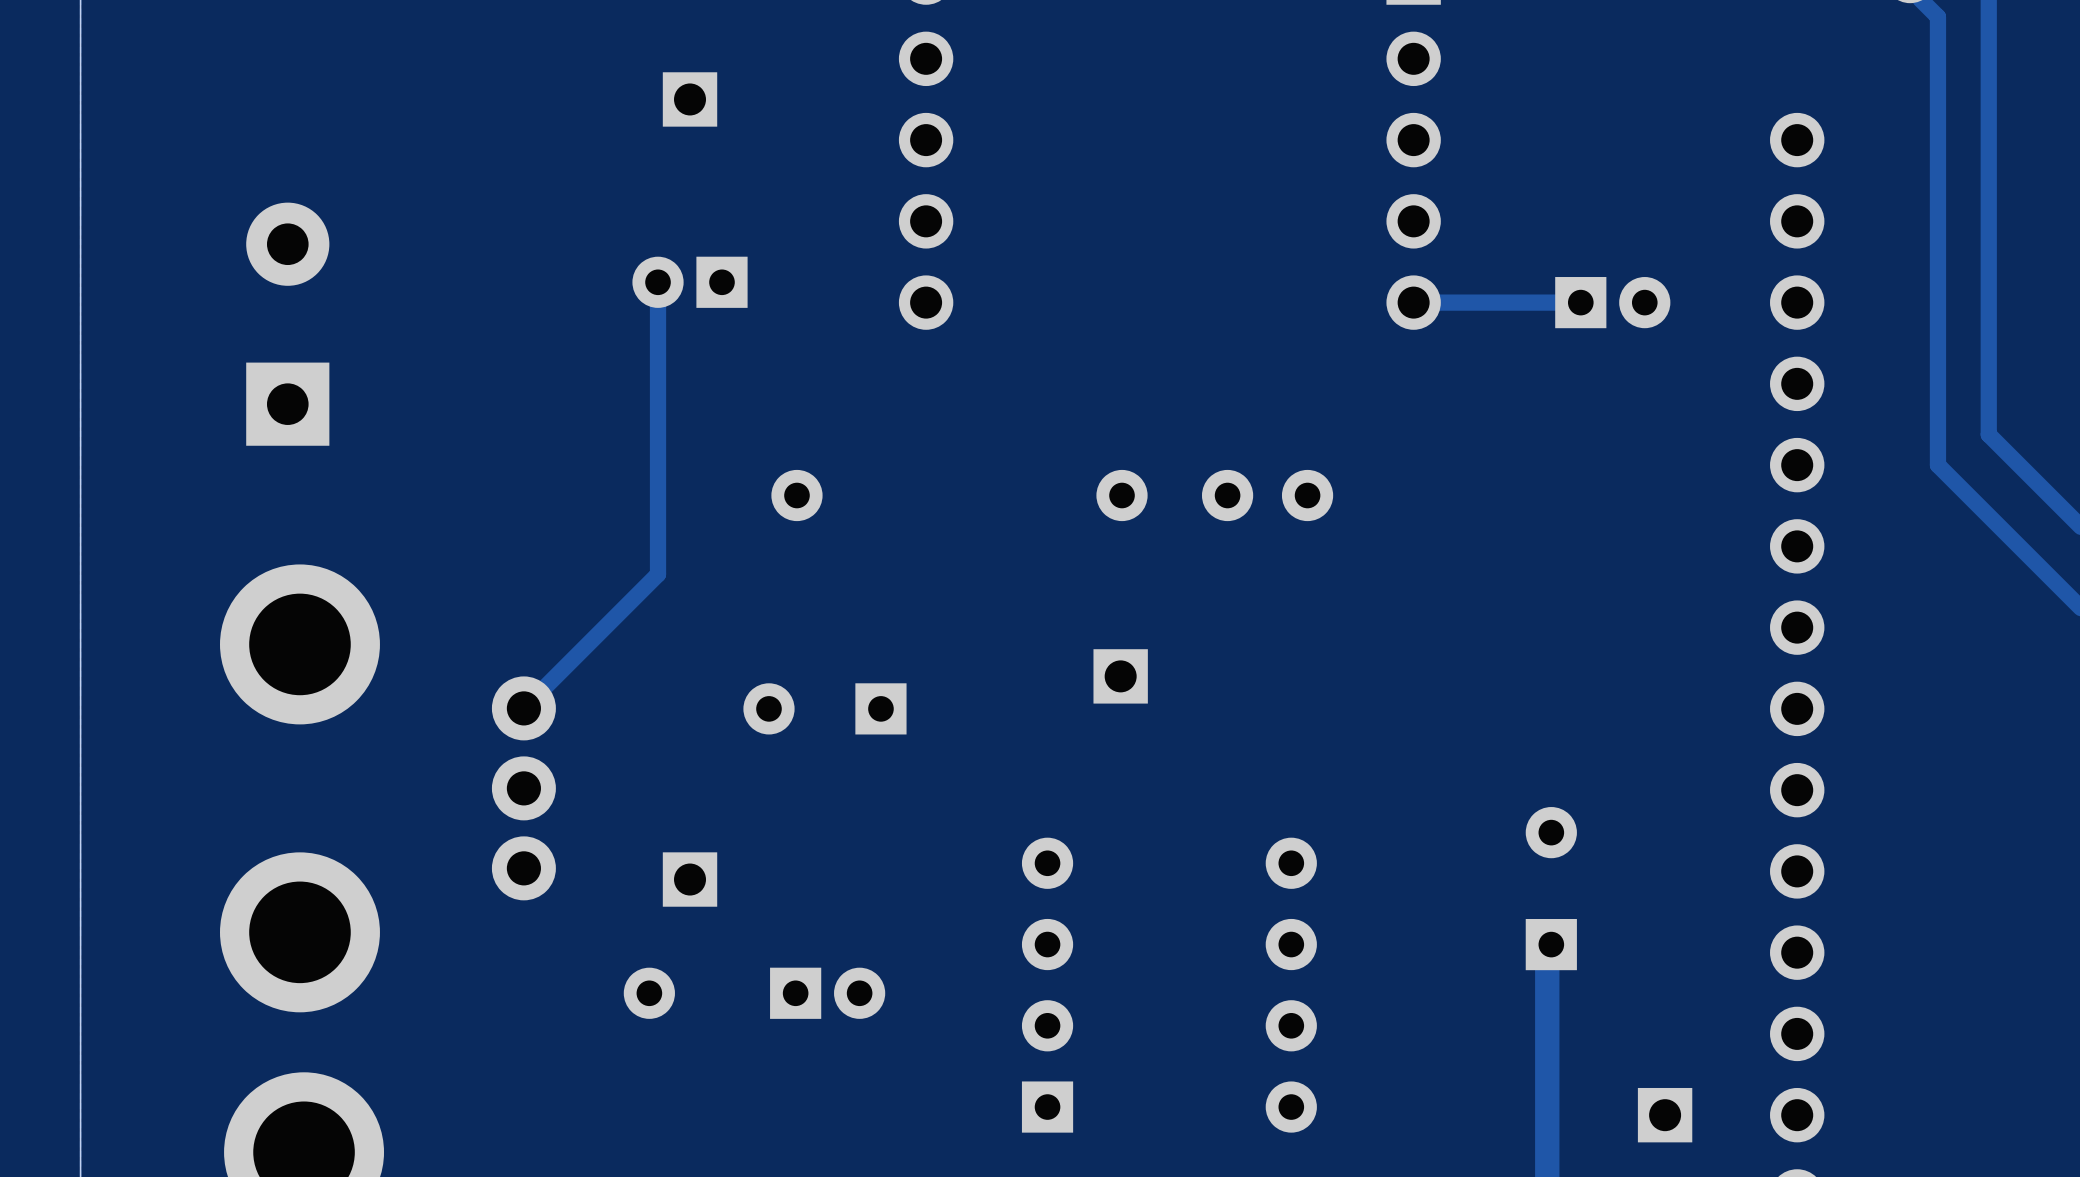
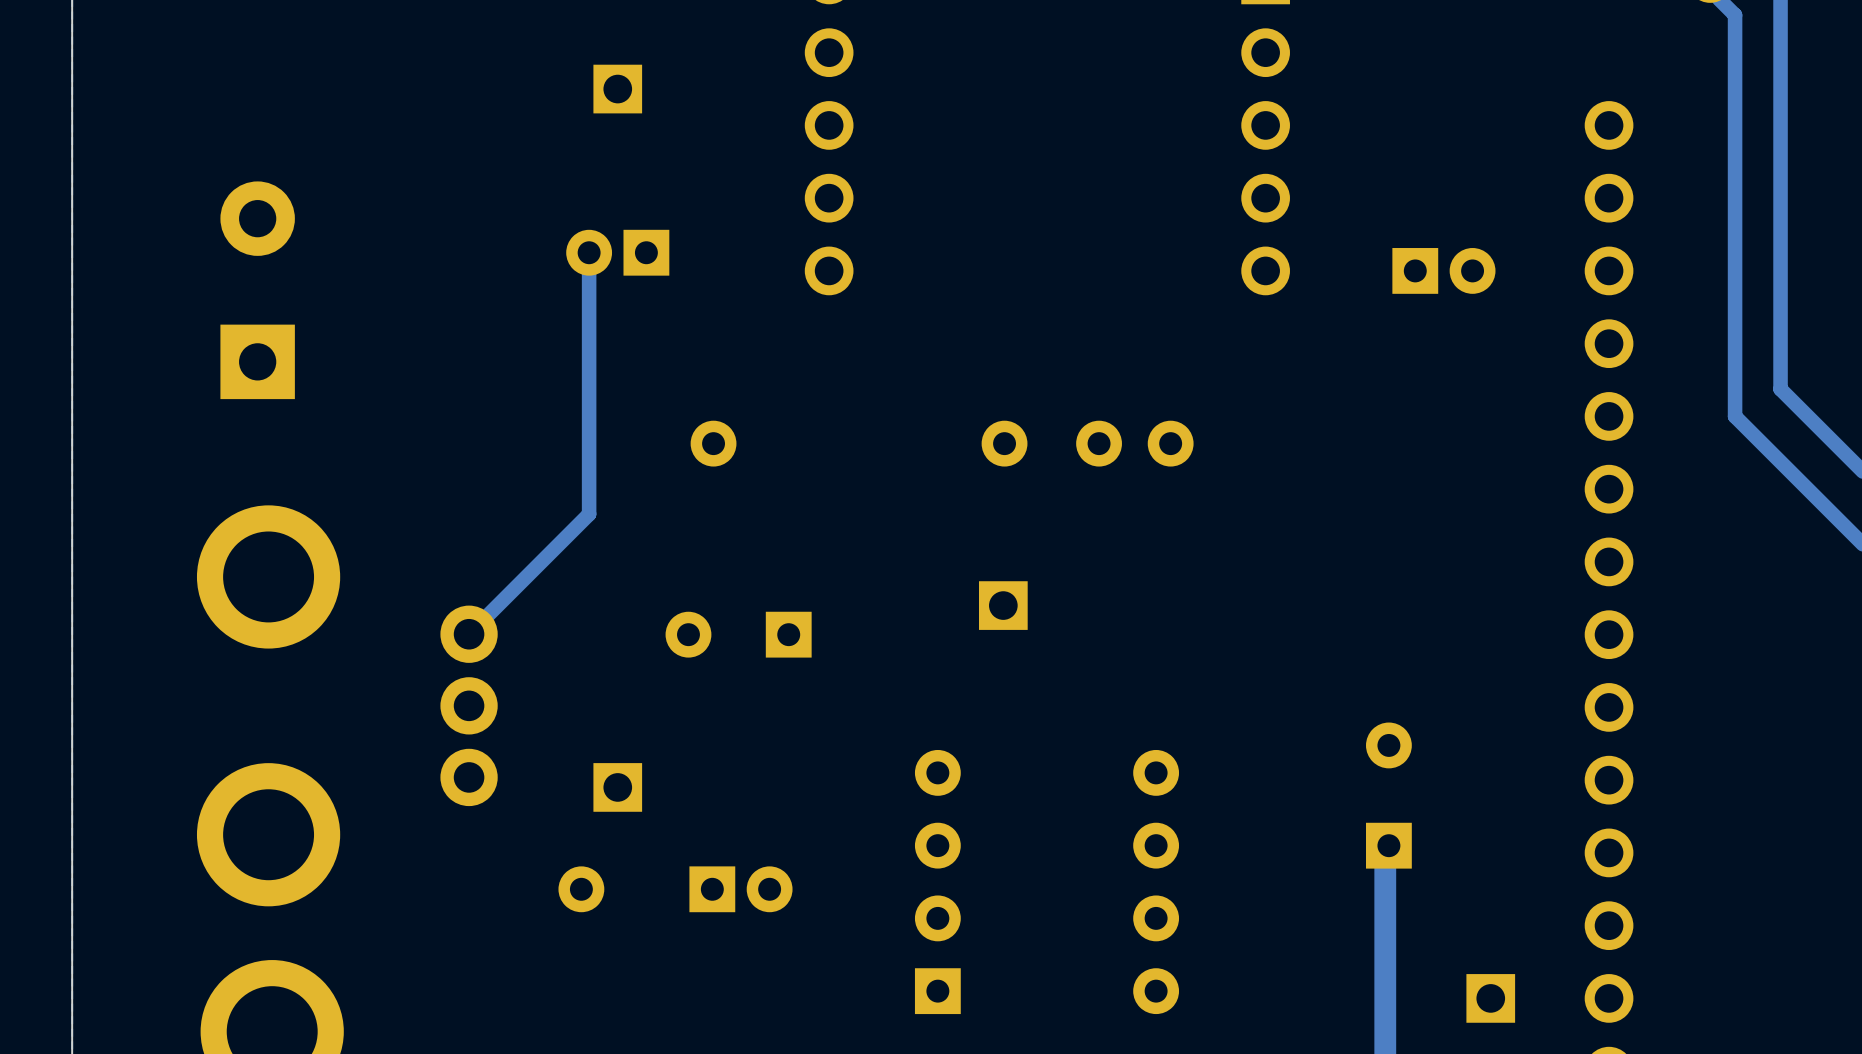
track: (1580, 302) (1413, 302) -> none

